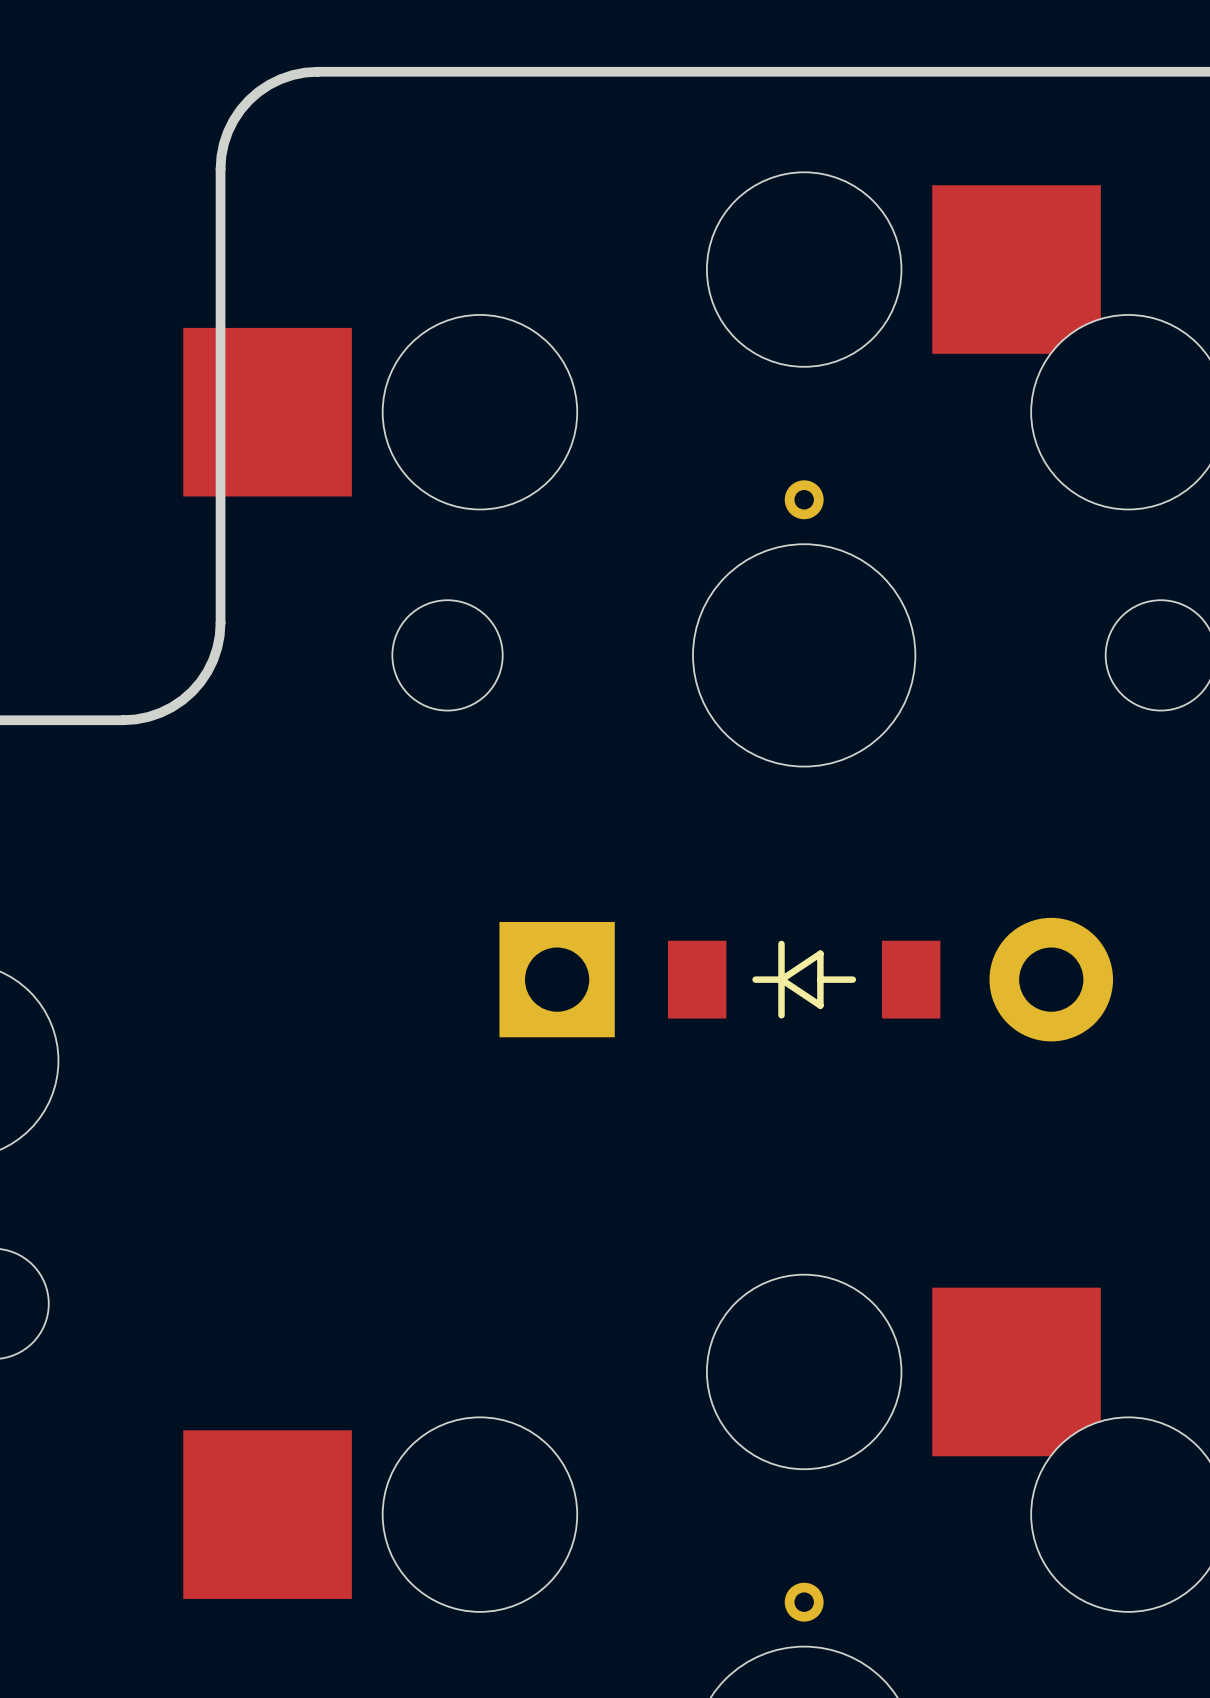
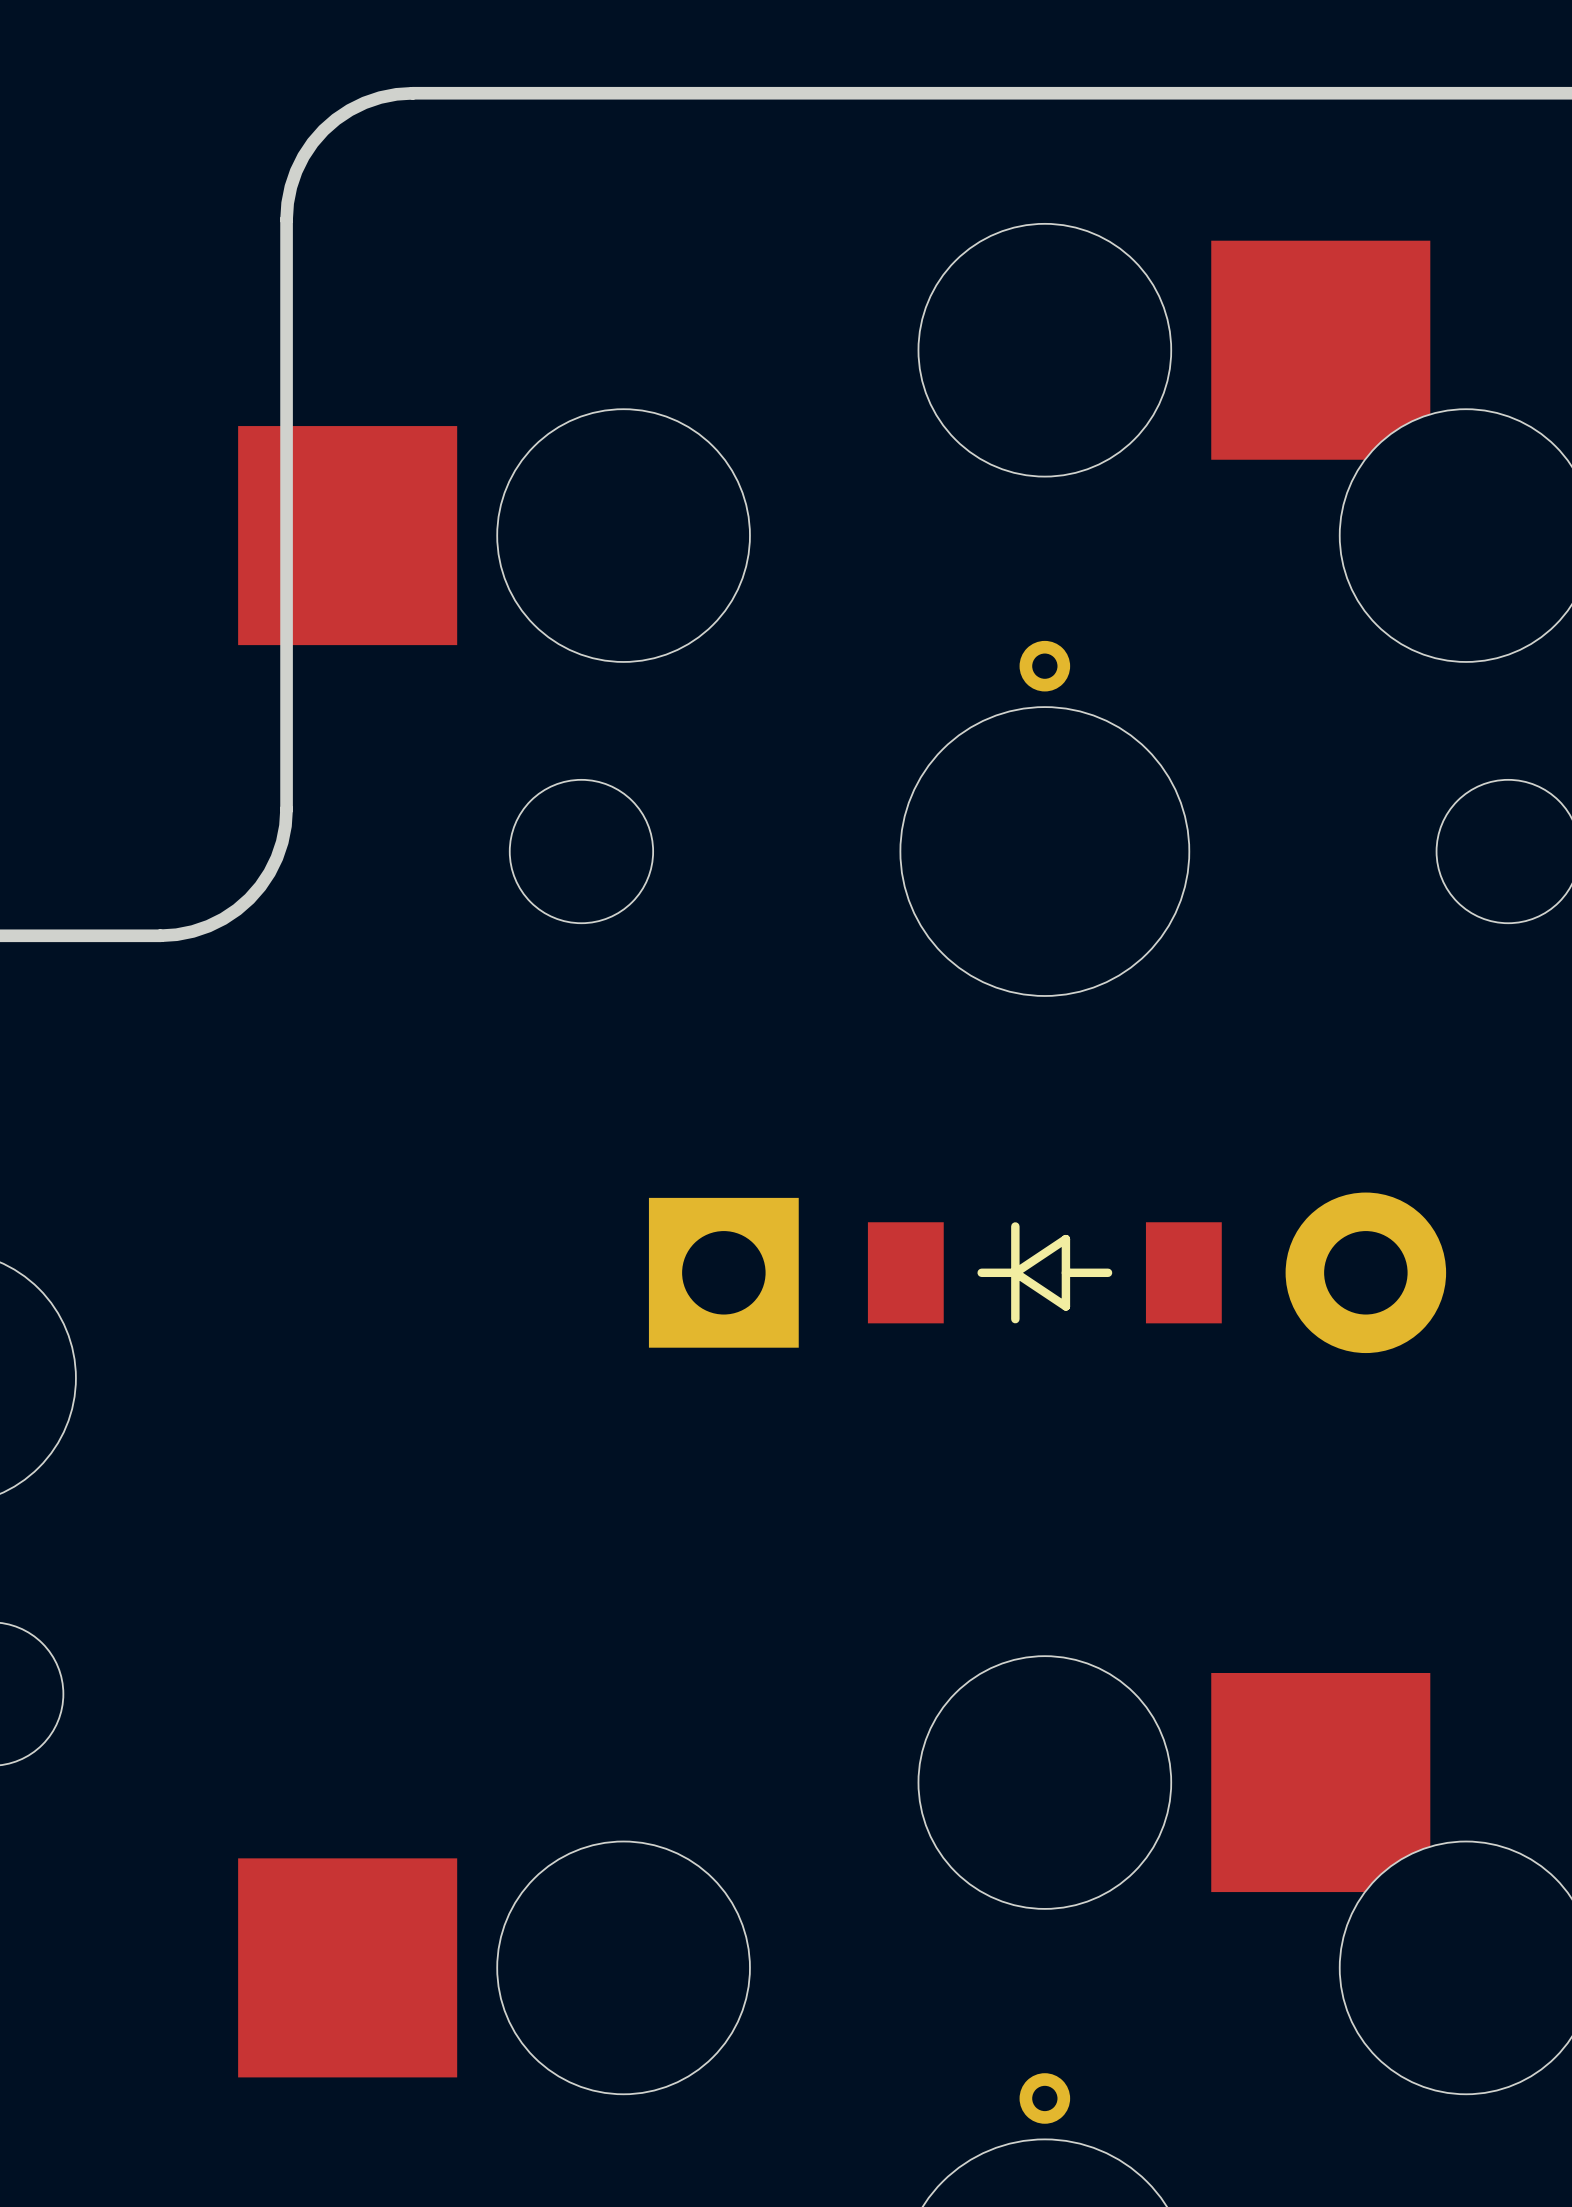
part position: (804, 499) -> (1044, 666)
part position: (804, 1602) -> (1044, 2098)

